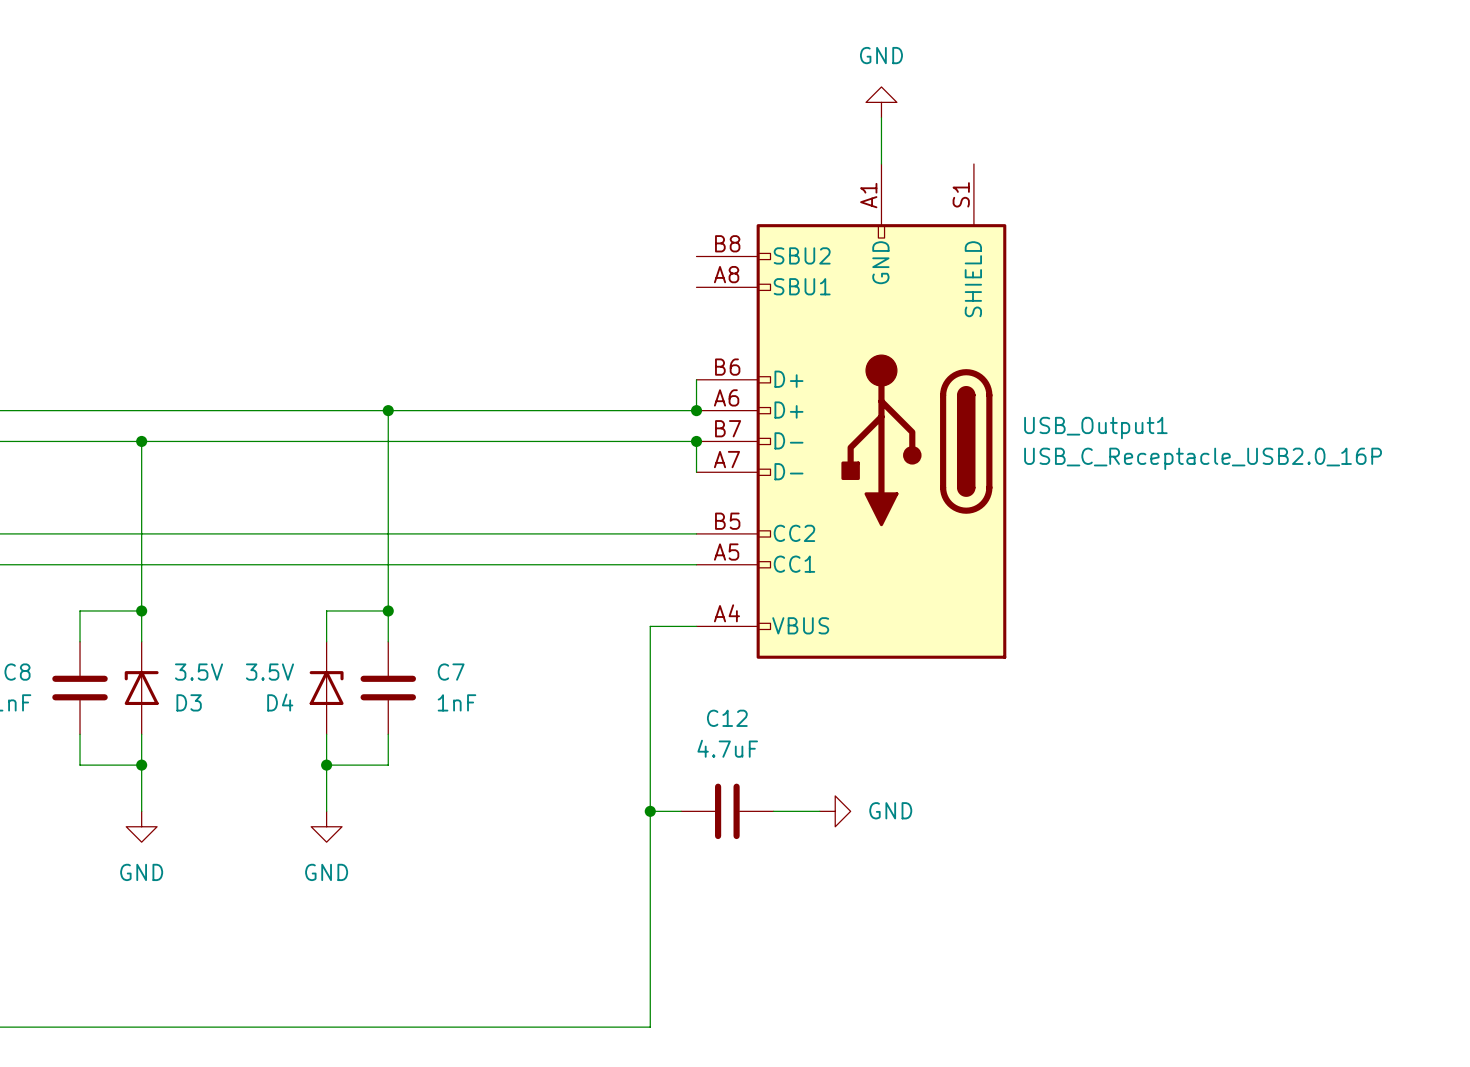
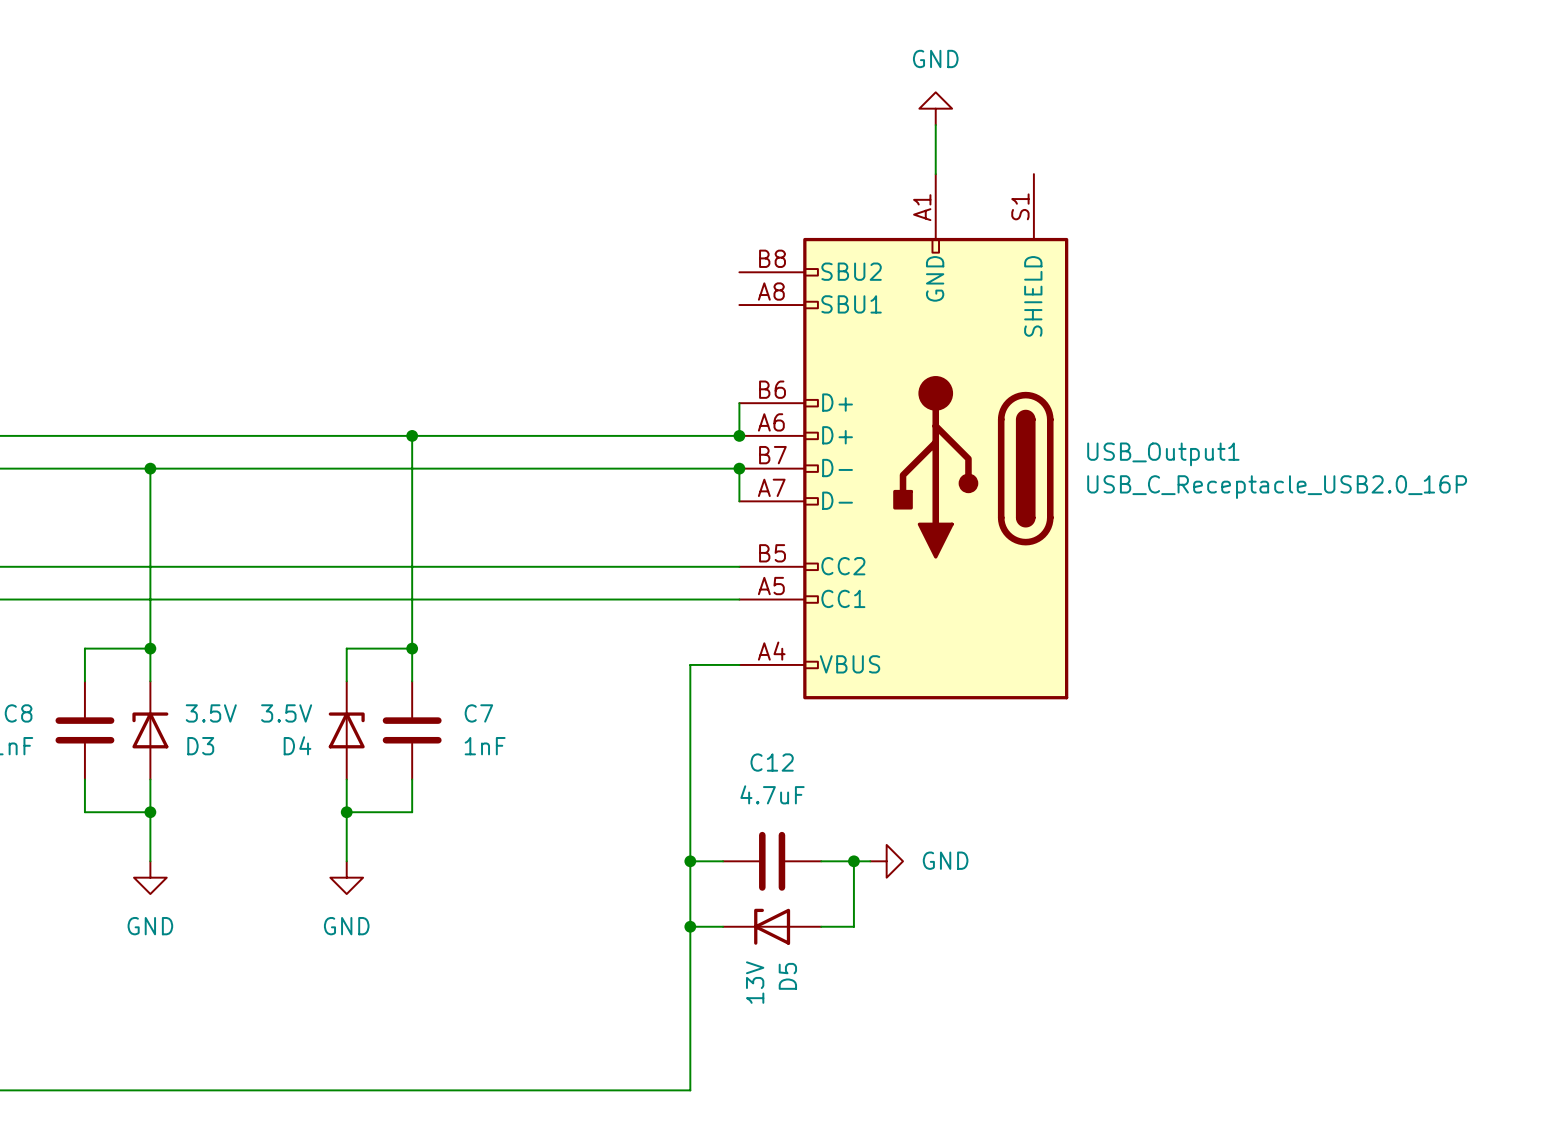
wire: none -> (853, 861) (853, 926) (821, 926)
junction: none -> (853, 861)
wire: none -> (690, 926) (723, 926)
junction: none -> (690, 926)
D5: none -> 13V (772, 926)

